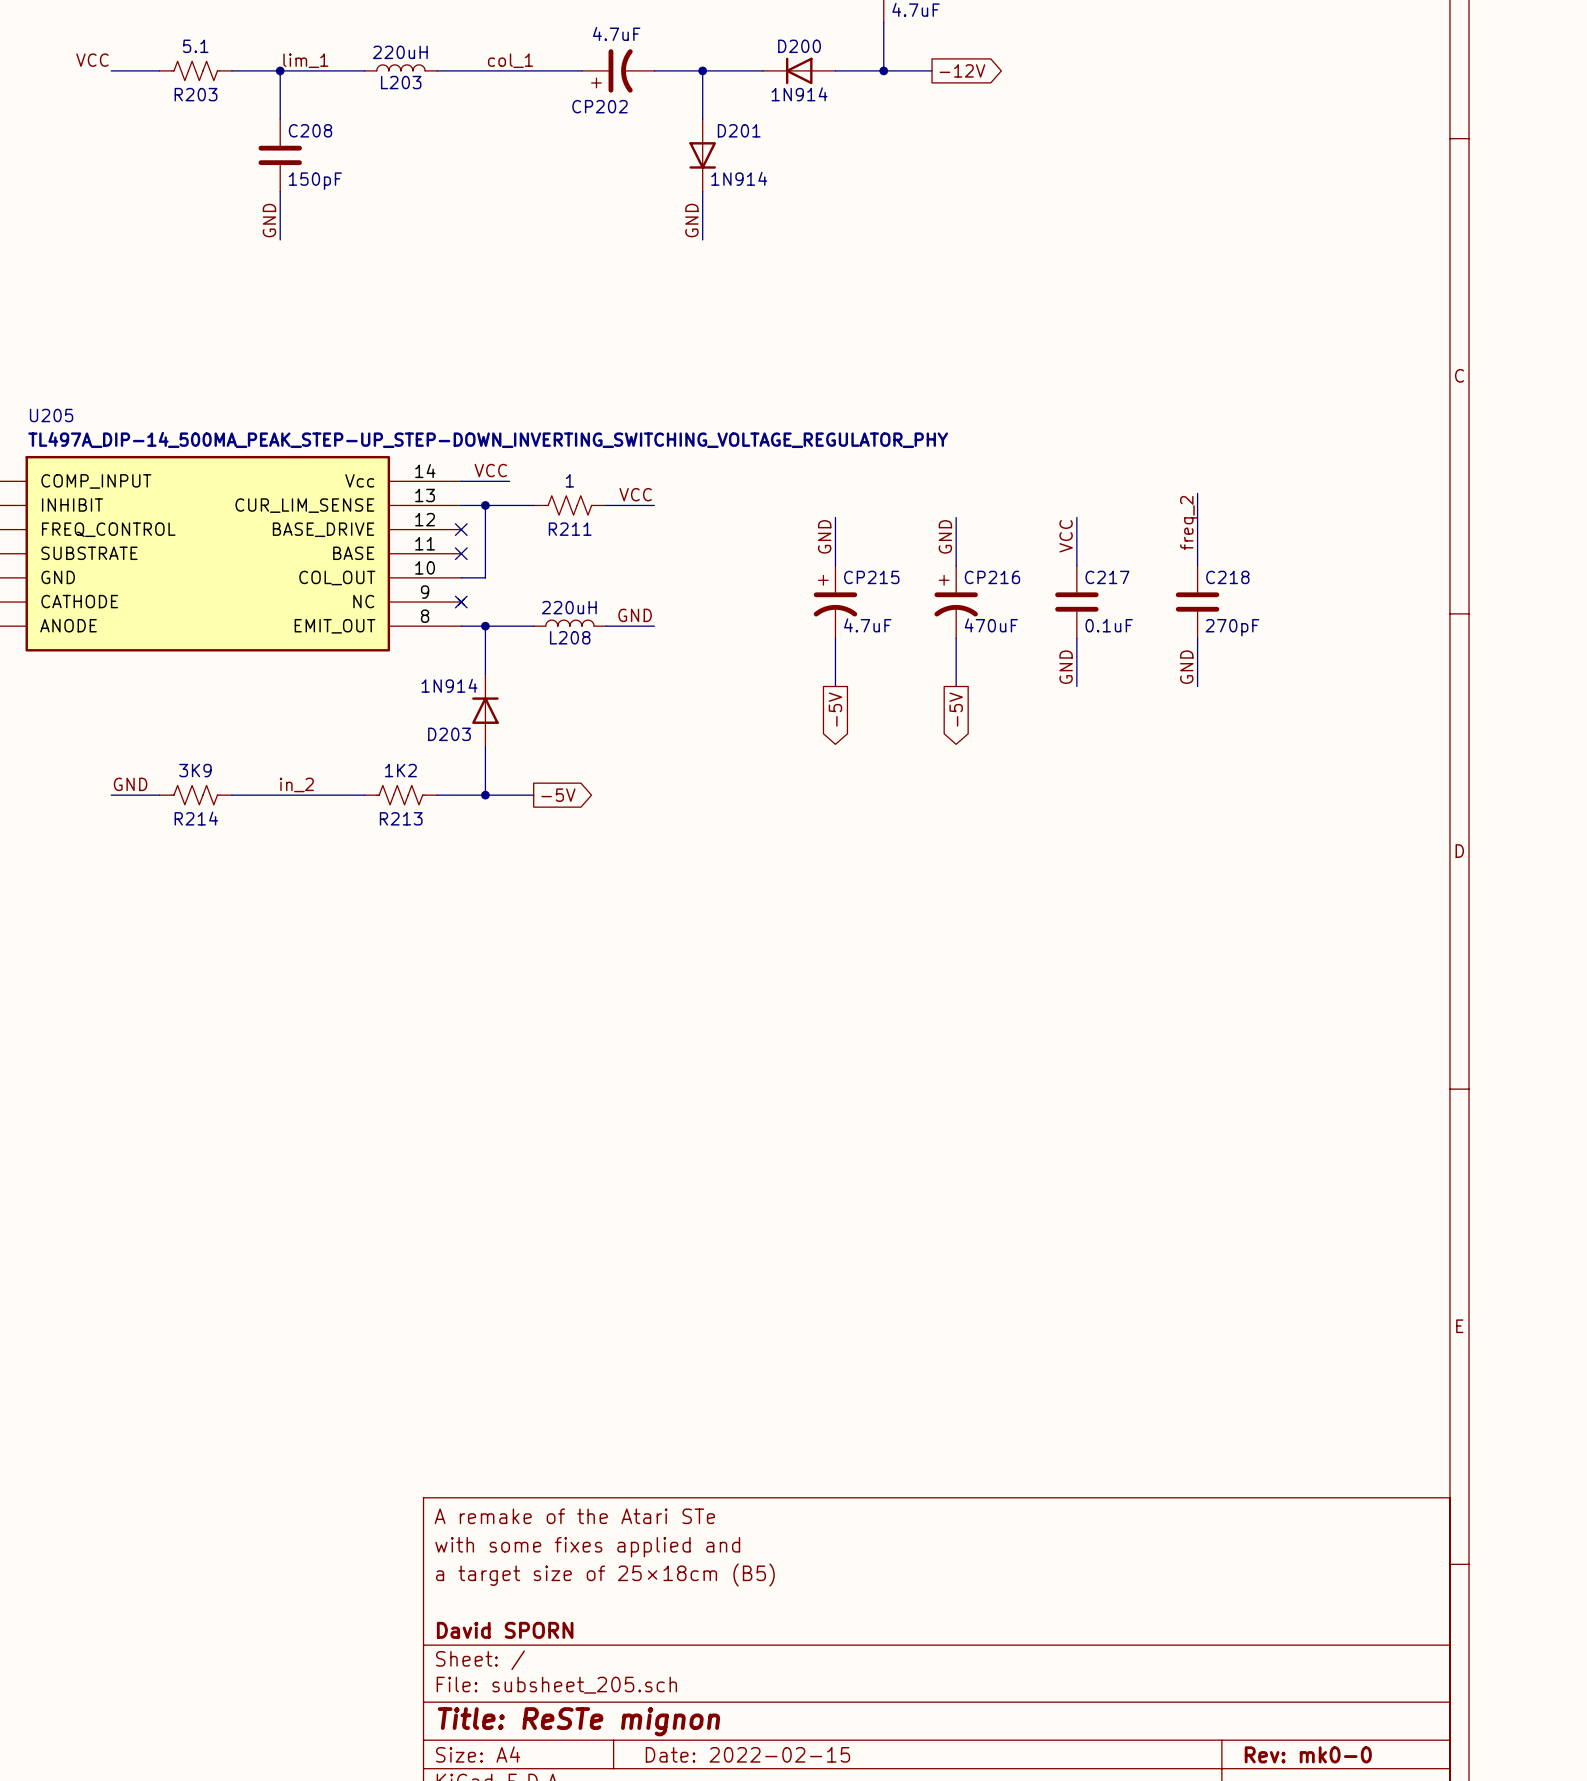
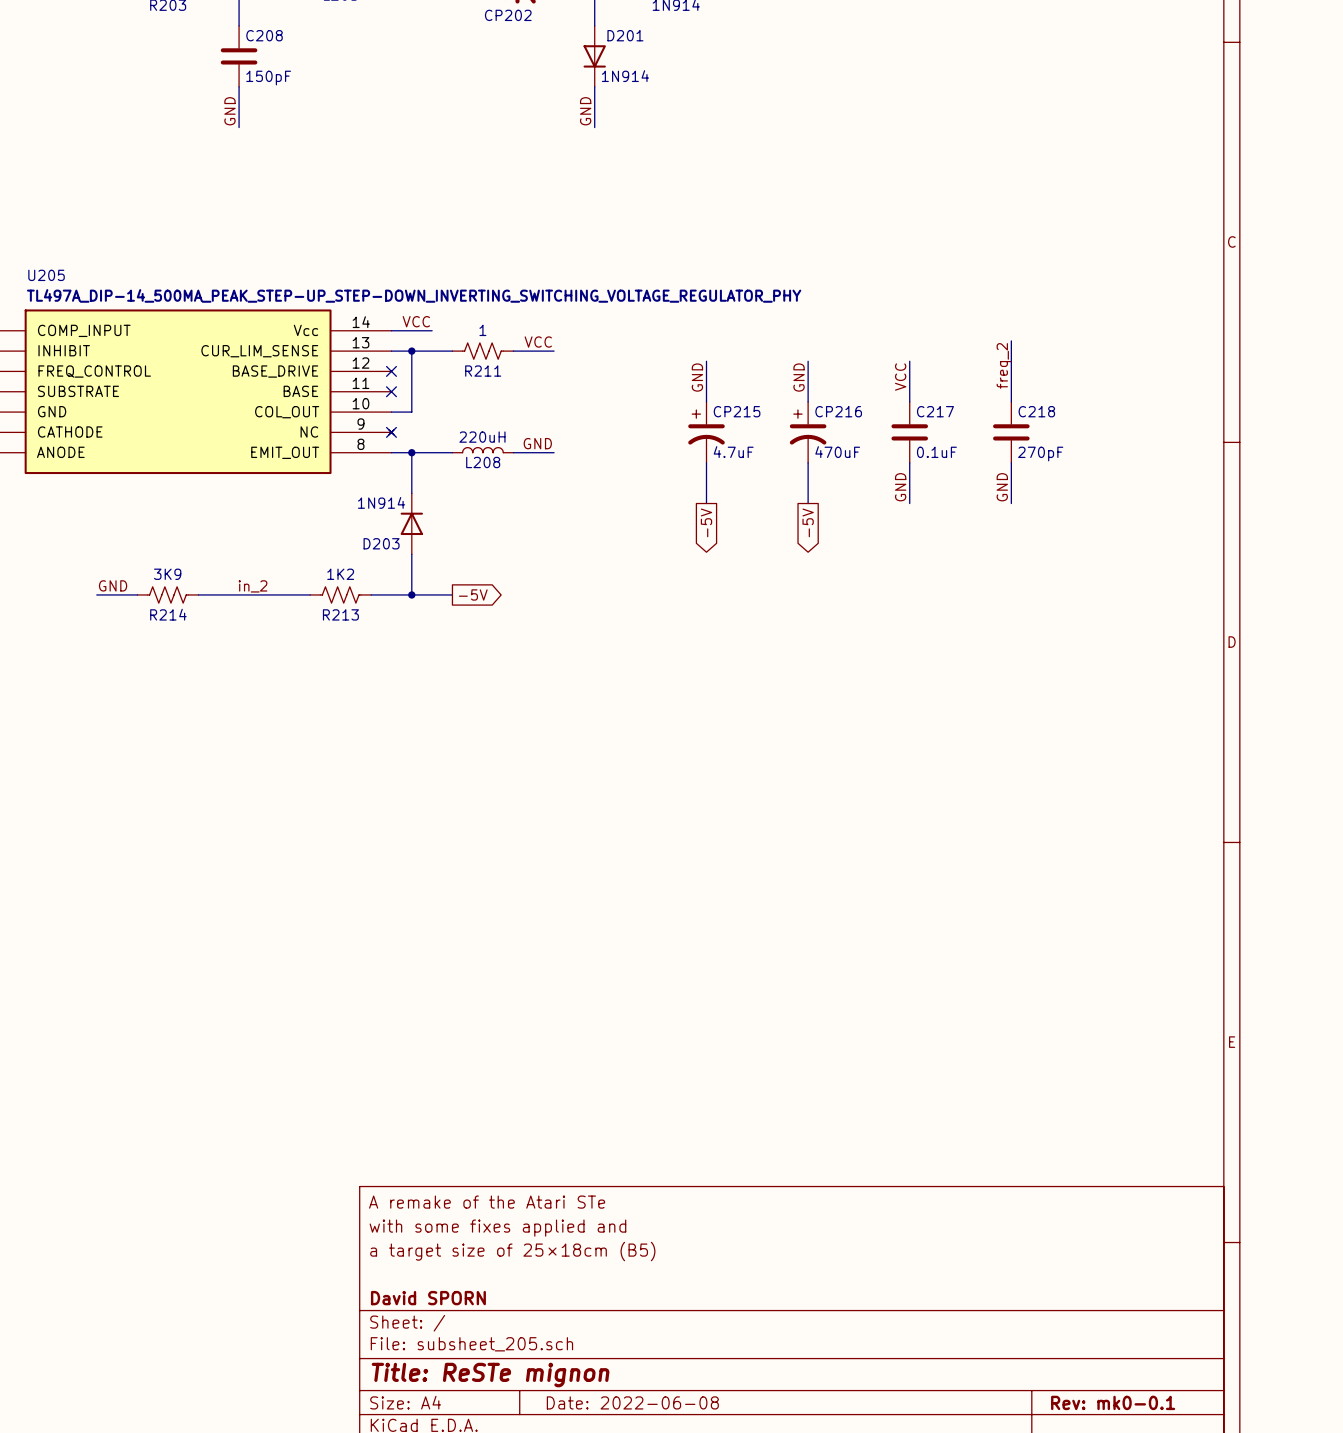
title block: Date: 2022-02-15 (747, 1754) -> Date: 2022-06-08 (632, 1402)
title block: Rev: mk0-0 (1308, 1754) -> Rev: mk0-0.1 (1113, 1402)

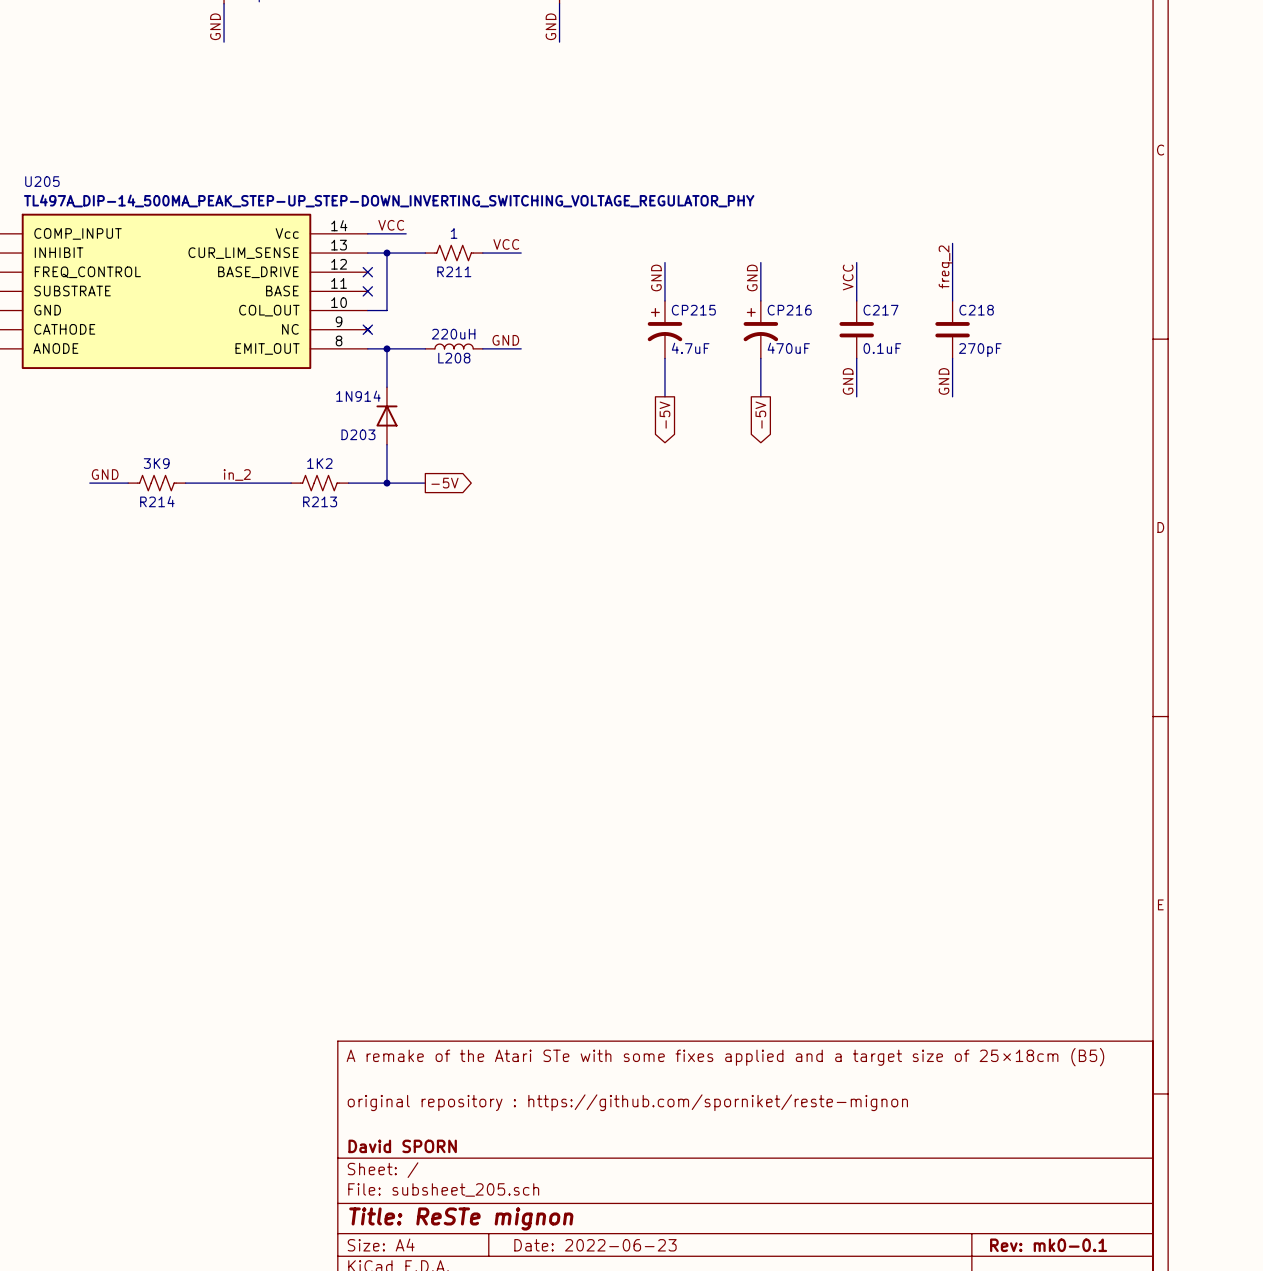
title block: A remake of the Atari STe (487, 1202) -> A remake of the Atari STe with some fixes applied and a target size of 25×18cm (B5) (725, 1057)
title block: with some fixes applied and (497, 1228) -> none
title block: a target size of 25×18cm (B5) (512, 1251) -> original repository : https://github.com/sporniket/reste-mignon (627, 1102)
title block: Date: 2022-06-08 (632, 1402) -> Date: 2022-06-23 (595, 1245)

